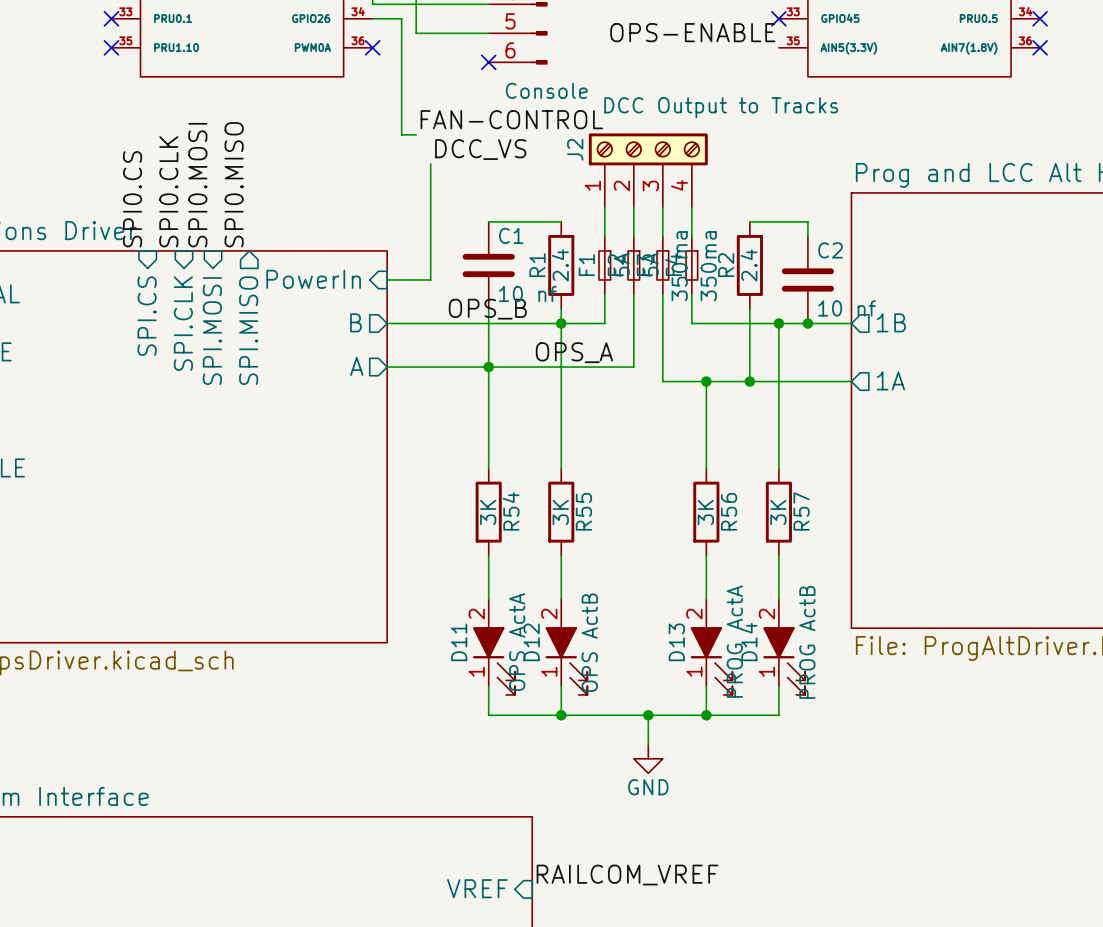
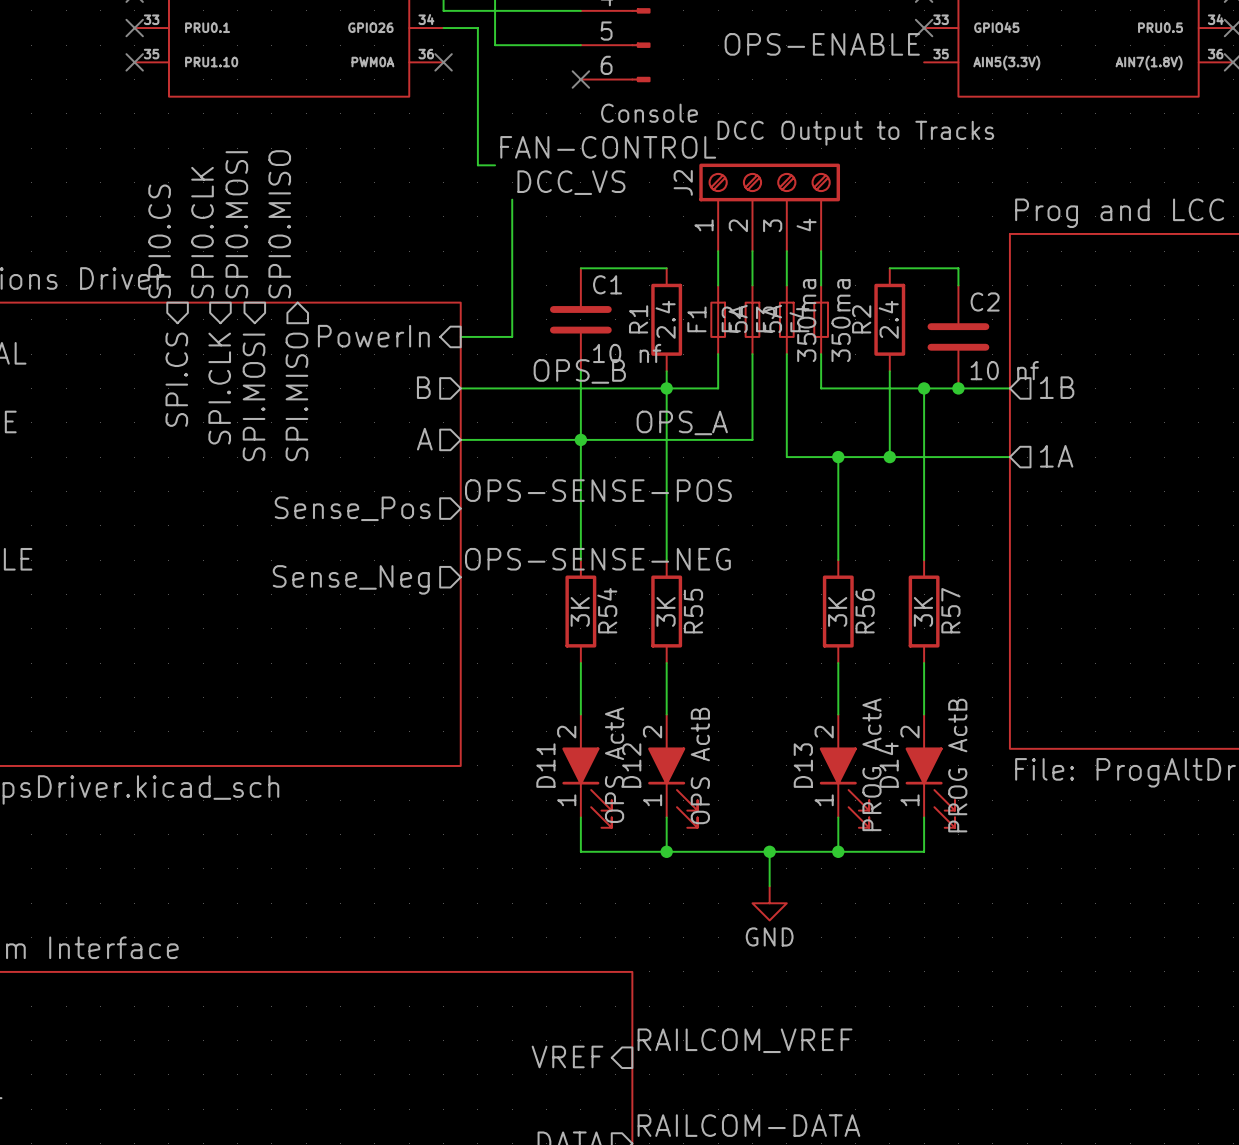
label: none -> OPS-SENSE-POS (598, 490)
sheet pin: none -> Sense_Pos (352, 508)
label: none -> OPS-SENSE-NEG (597, 559)
sheet pin: none -> Sense_Neg (351, 579)

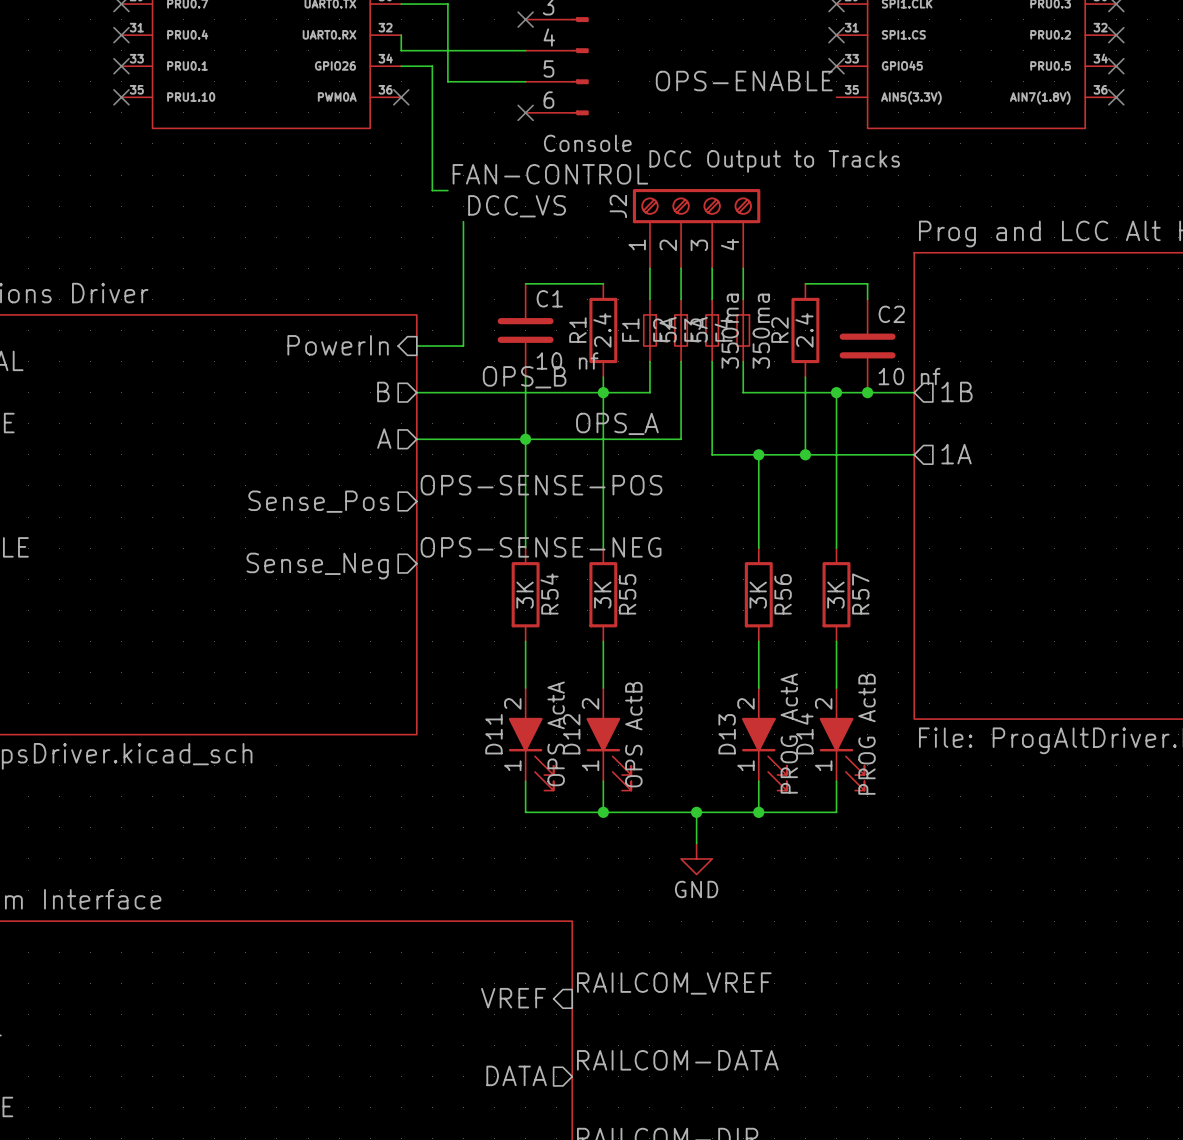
label: SPI0.MOSI (236, 224) -> none
label: SPI0.MISO (279, 224) -> none
label: SPI0.CLK (202, 232) -> none
label: SPI0.CS (159, 241) -> none
sheet pin: SPI.CS (176, 379) -> none
sheet pin: SPI.CLK (219, 388) -> none
sheet pin: SPI.MISO (296, 396) -> none
sheet pin: SPI.MOSI (254, 397) -> none

